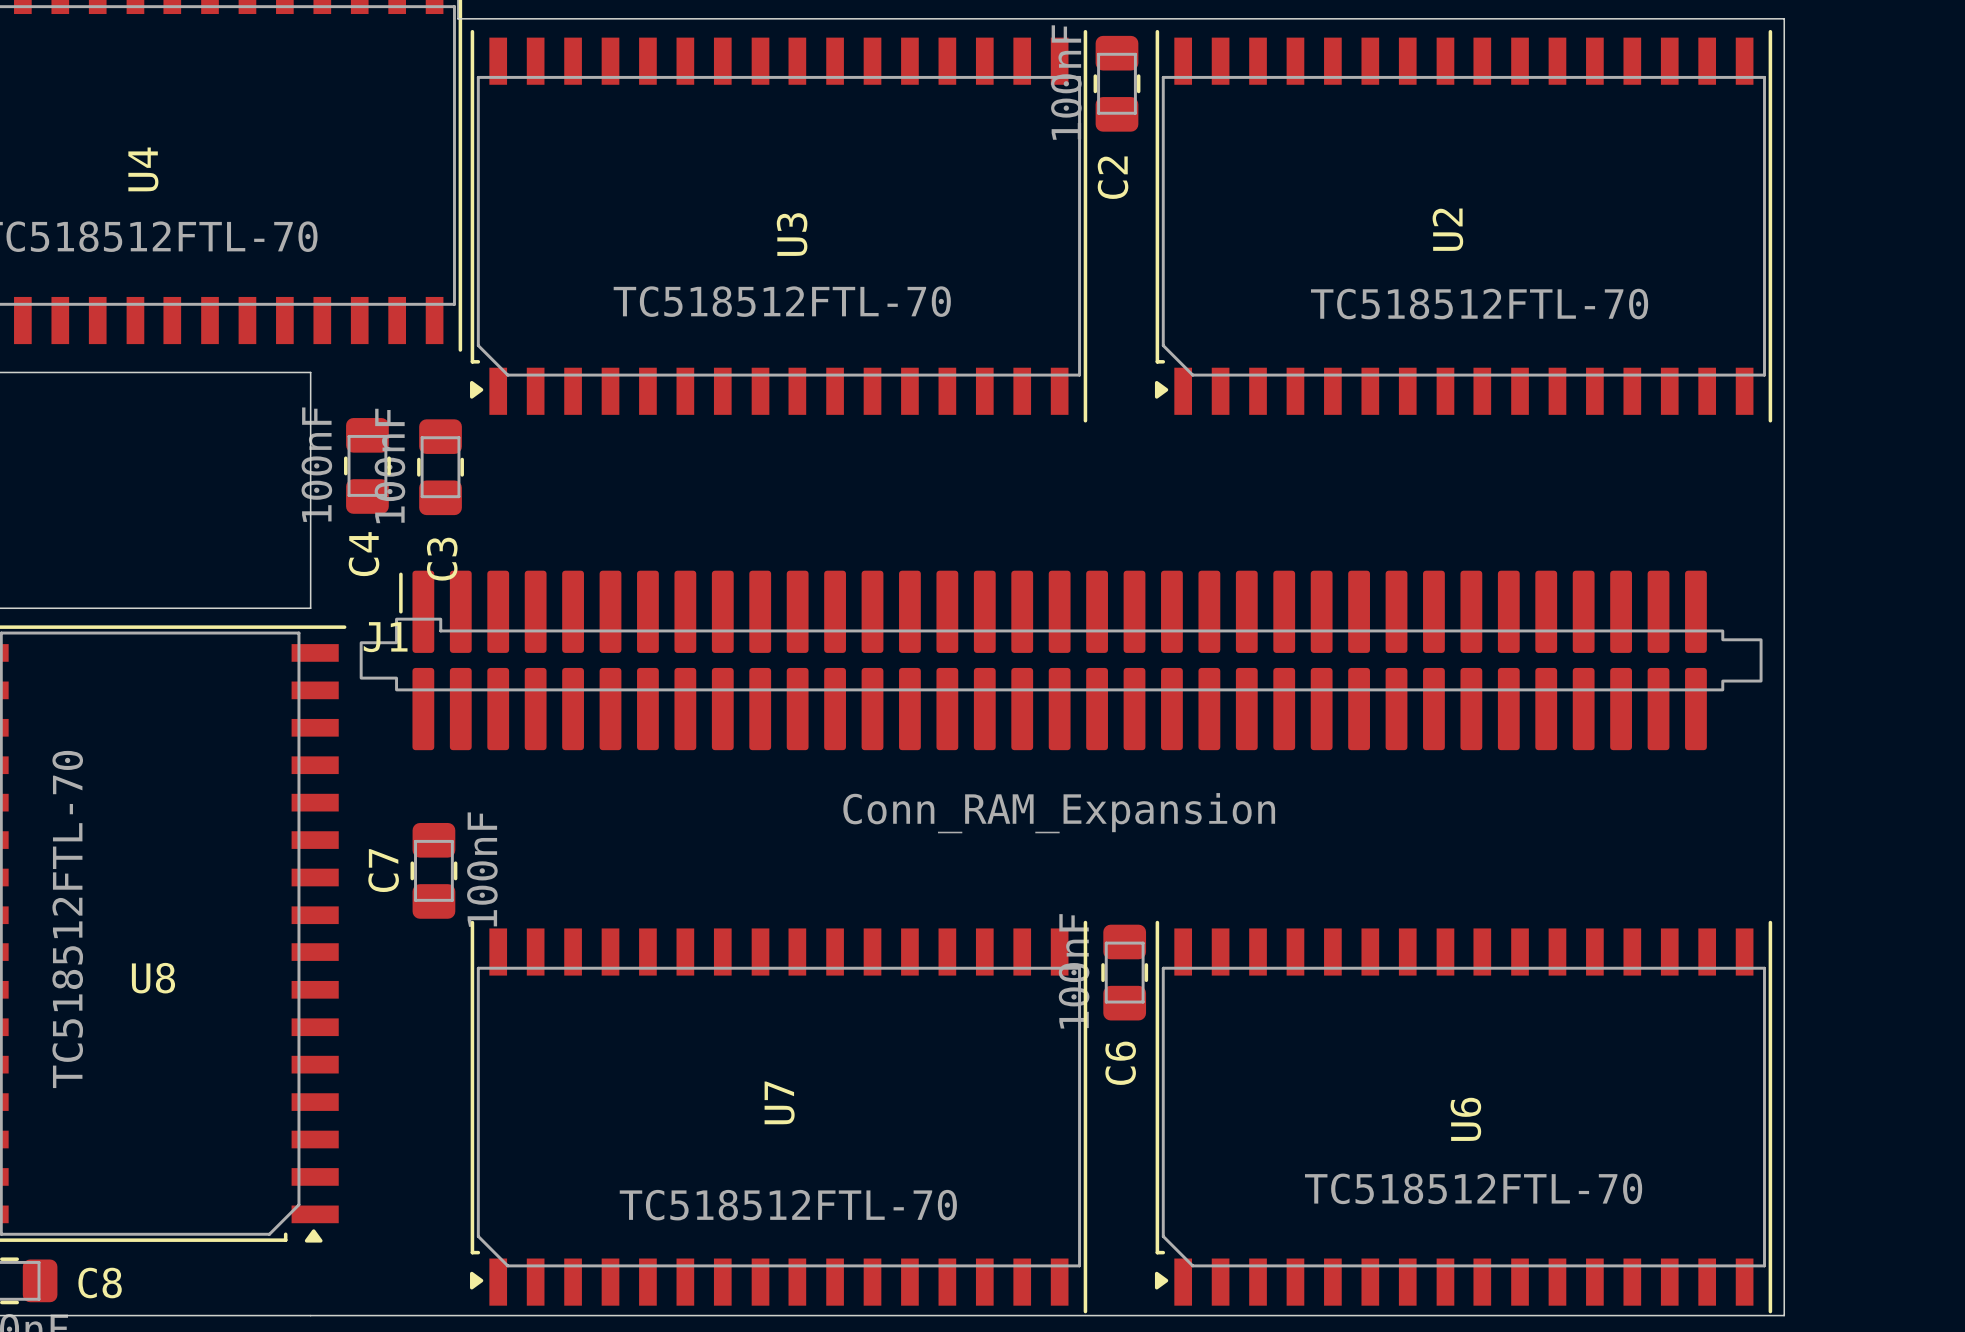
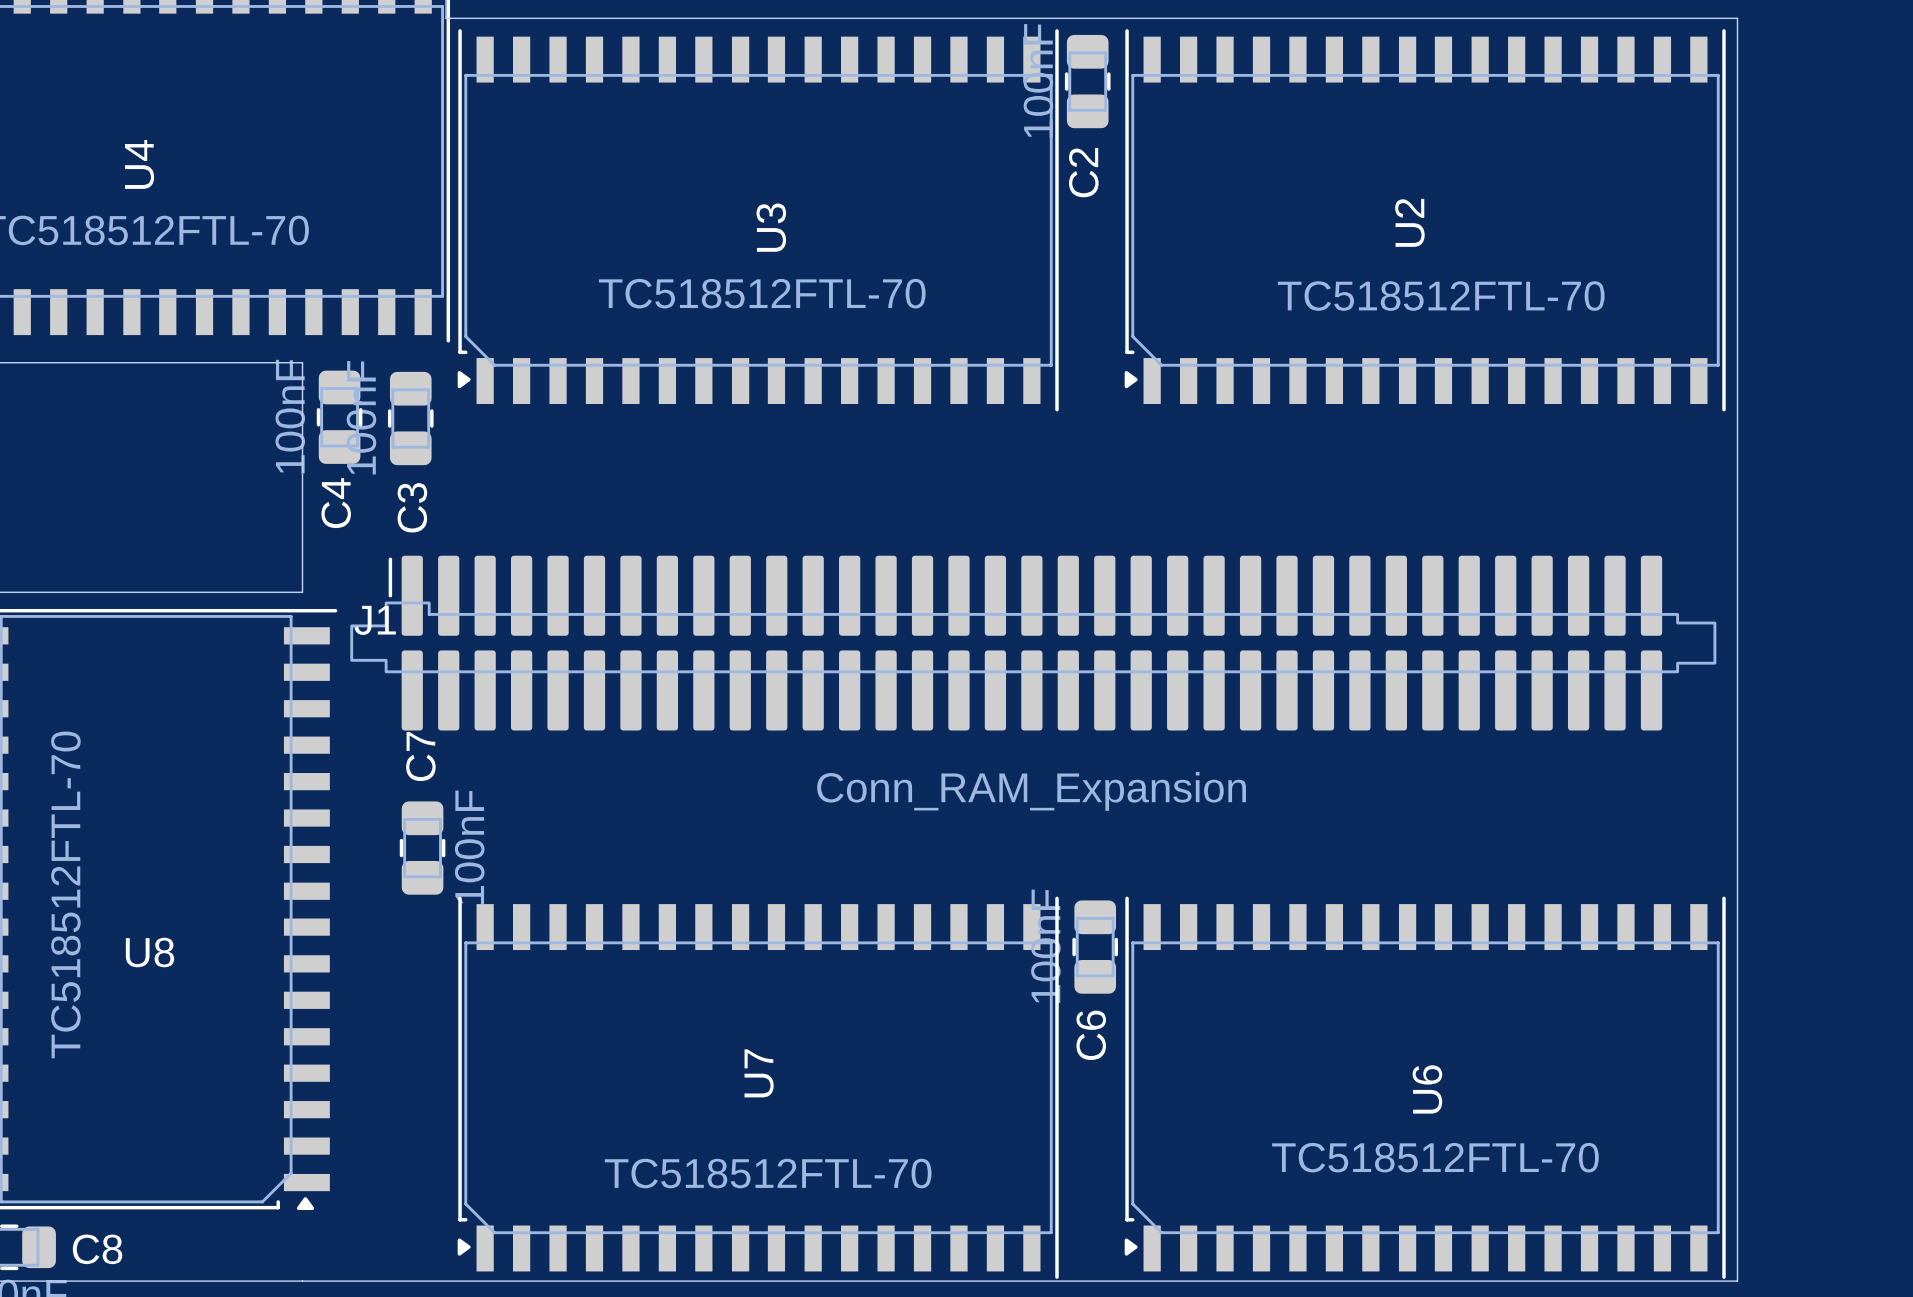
C4 position: (367, 465) -> (339, 417)
C3 position: (440, 467) -> (410, 418)
C7 name position: C7 (383, 870) -> C7 (420, 756)

